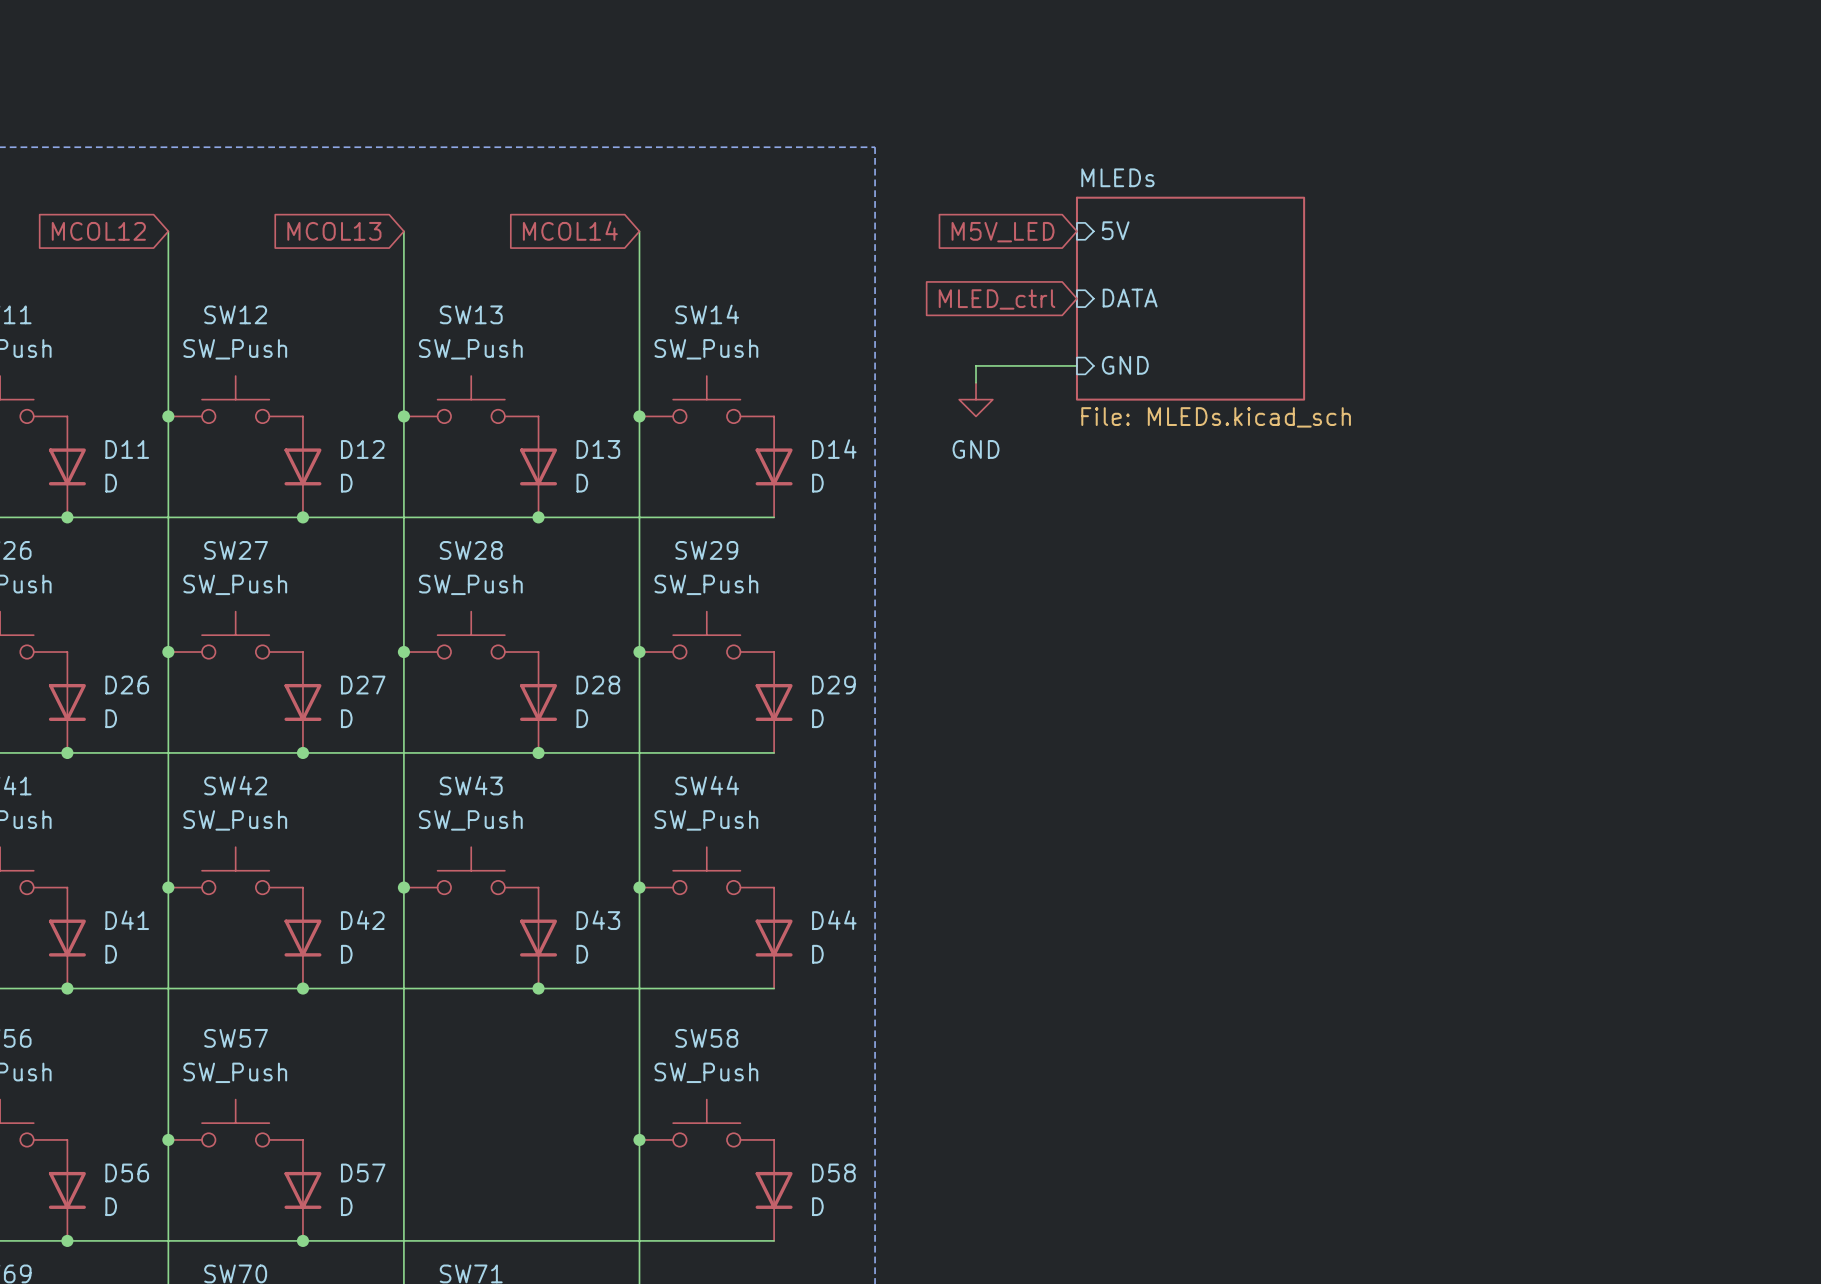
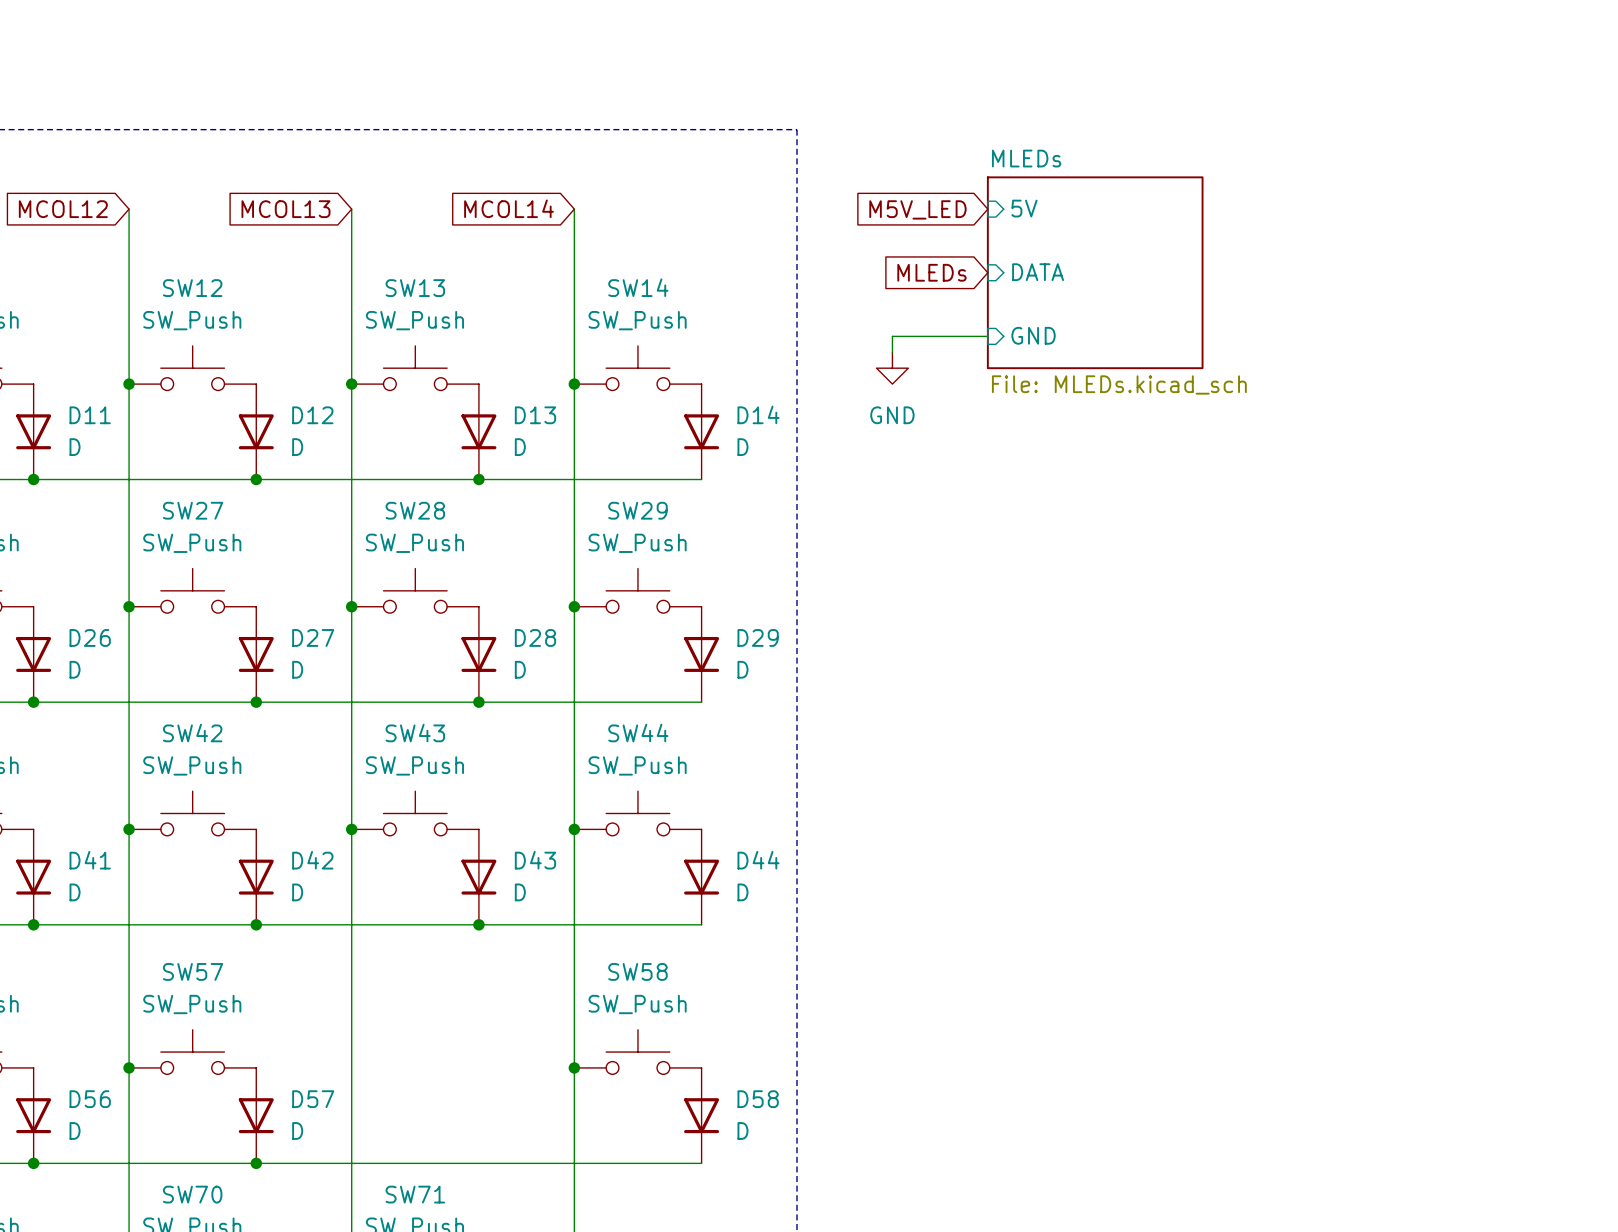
global label: MLED_ctrl (997, 299) -> MLEDs (931, 272)

